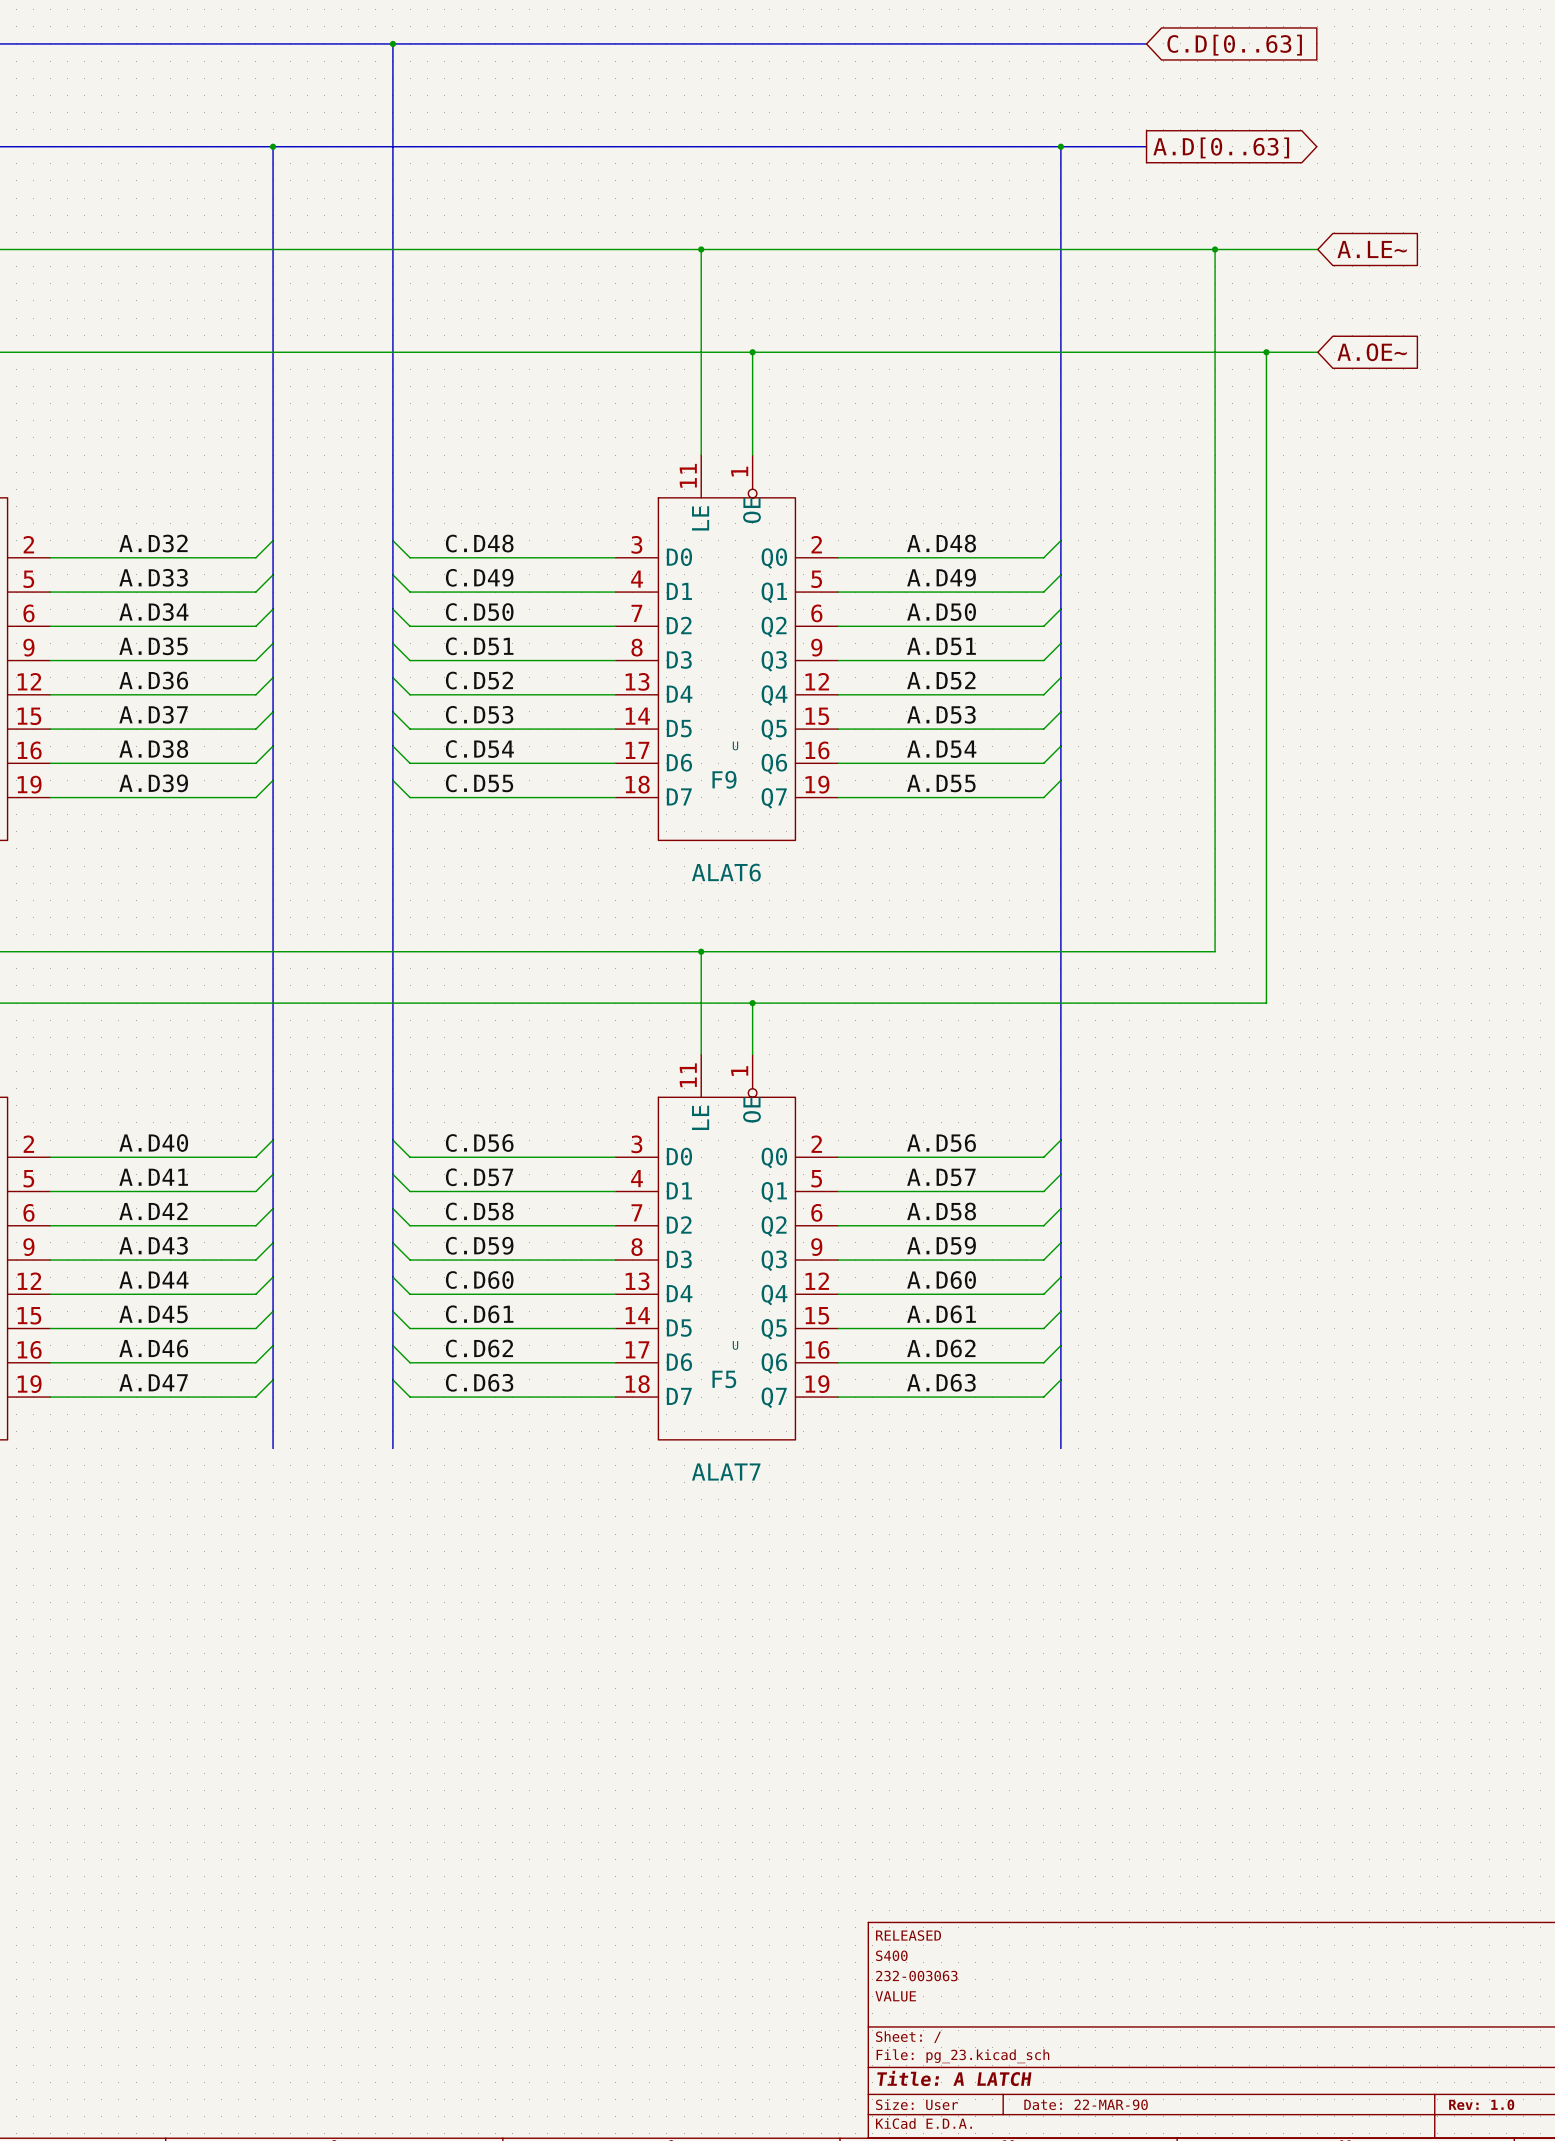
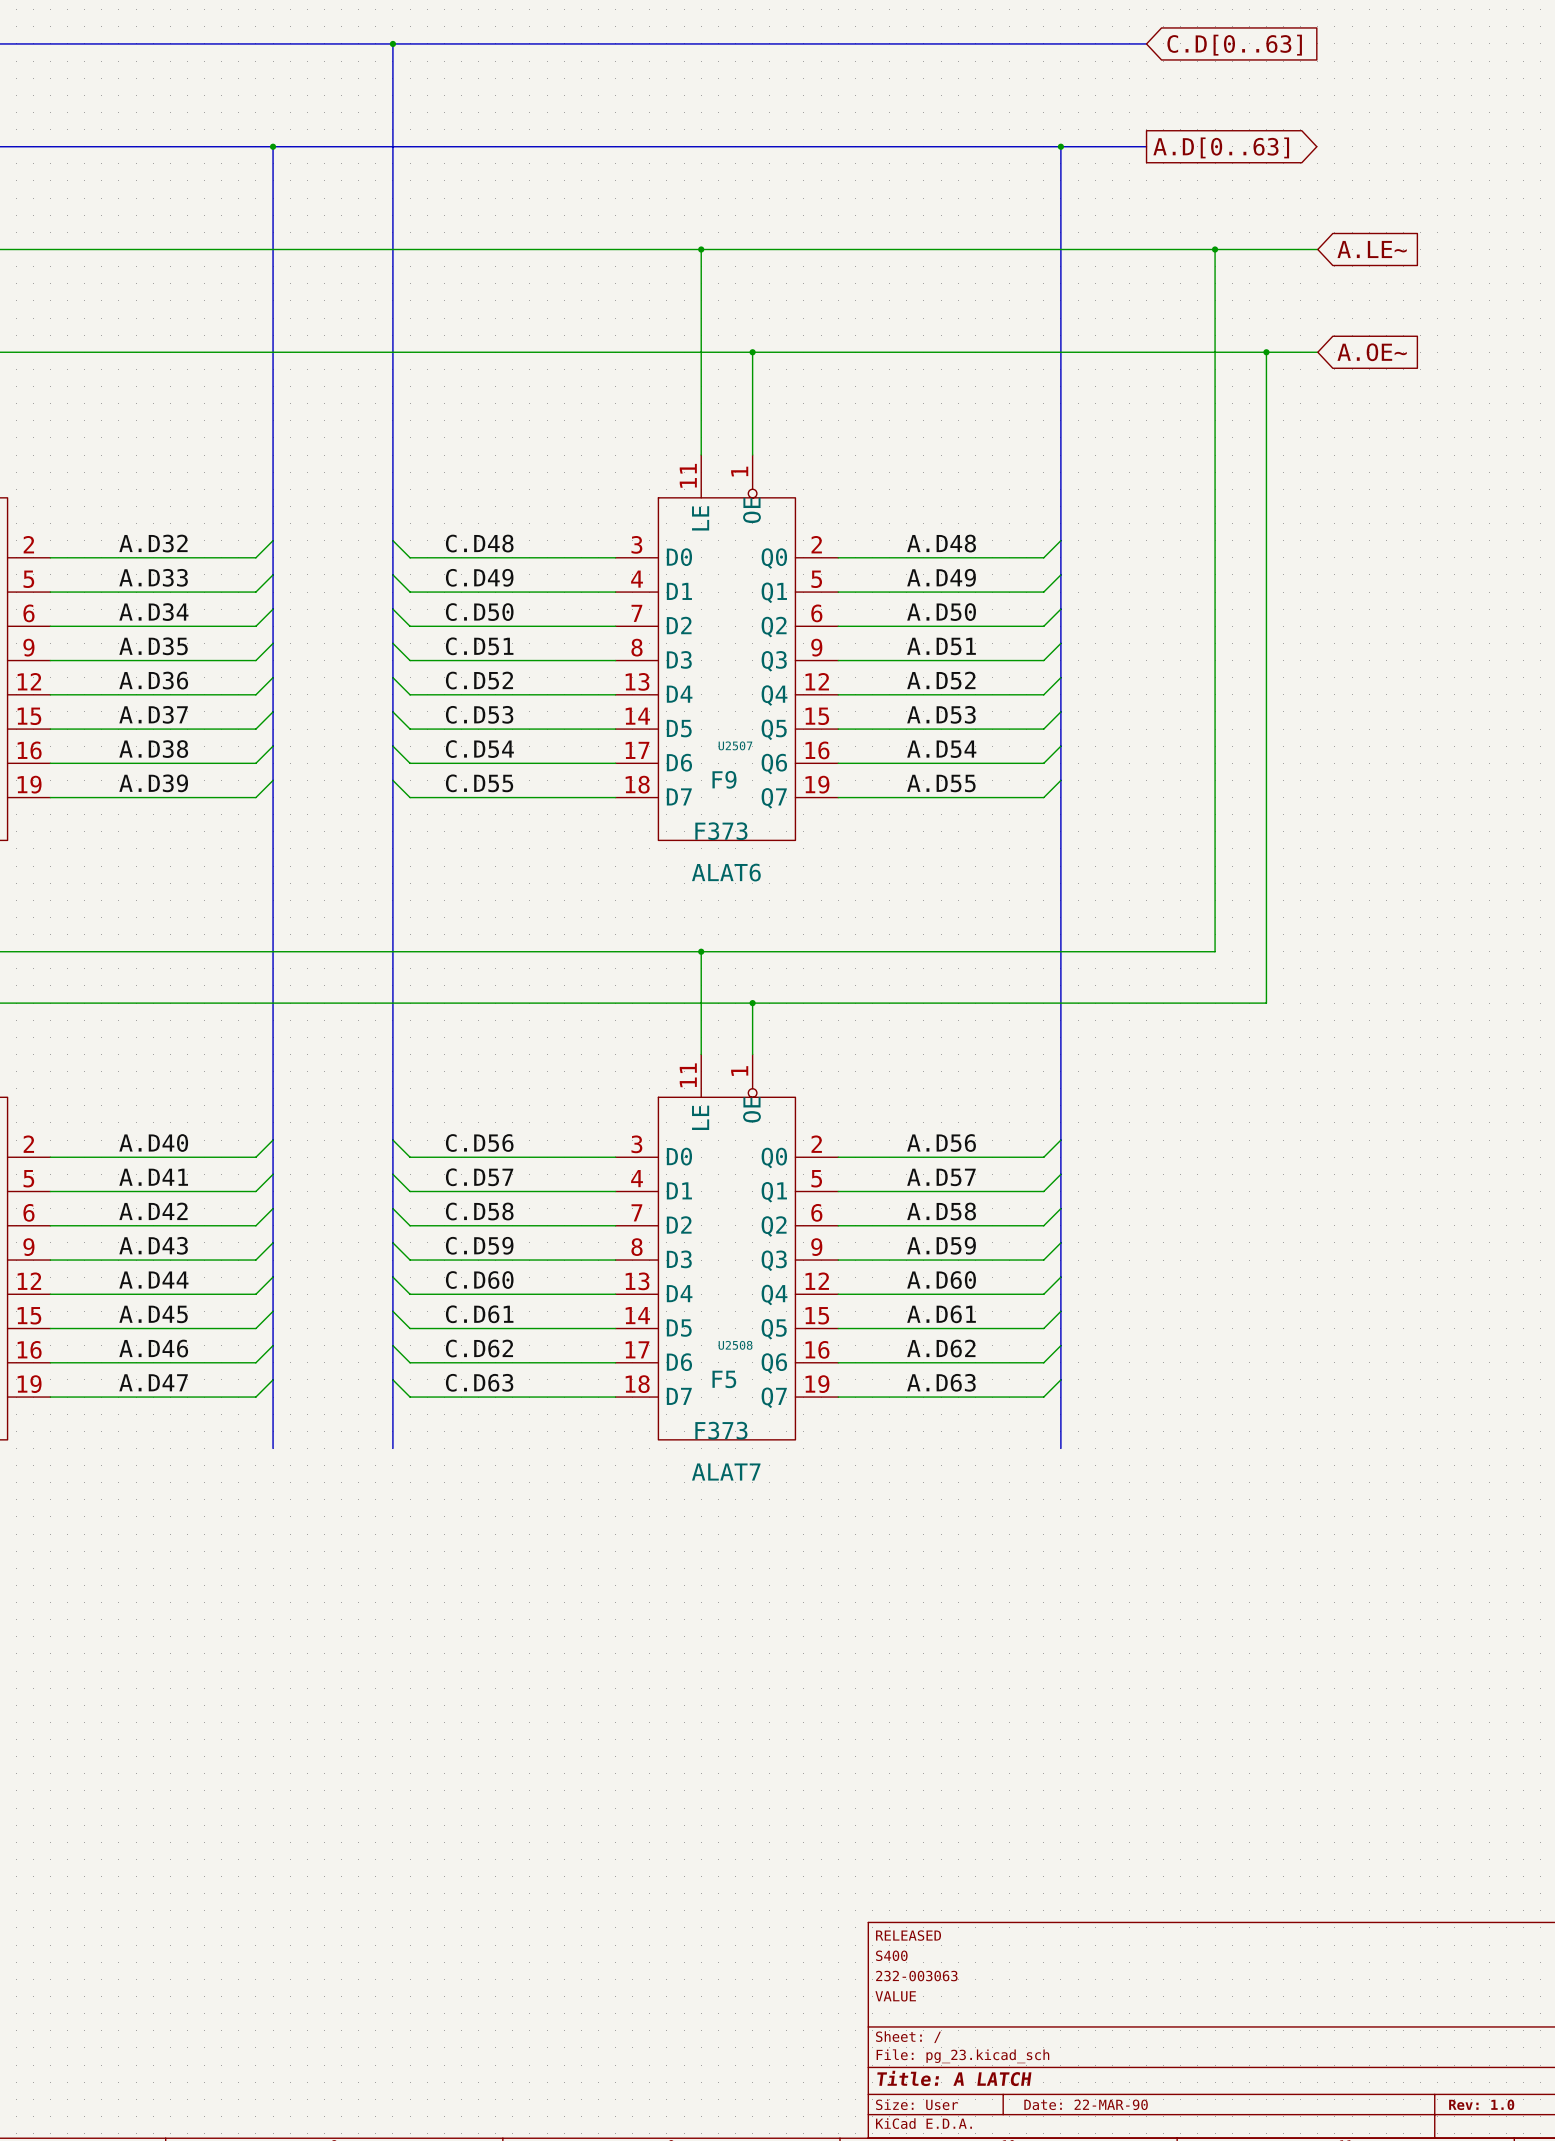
U name: U (735, 745) -> U2507 (735, 745)
U value: none -> F373 (721, 831)
U name: U (735, 1345) -> U2508 (735, 1345)
U value: none -> F373 (721, 1430)

